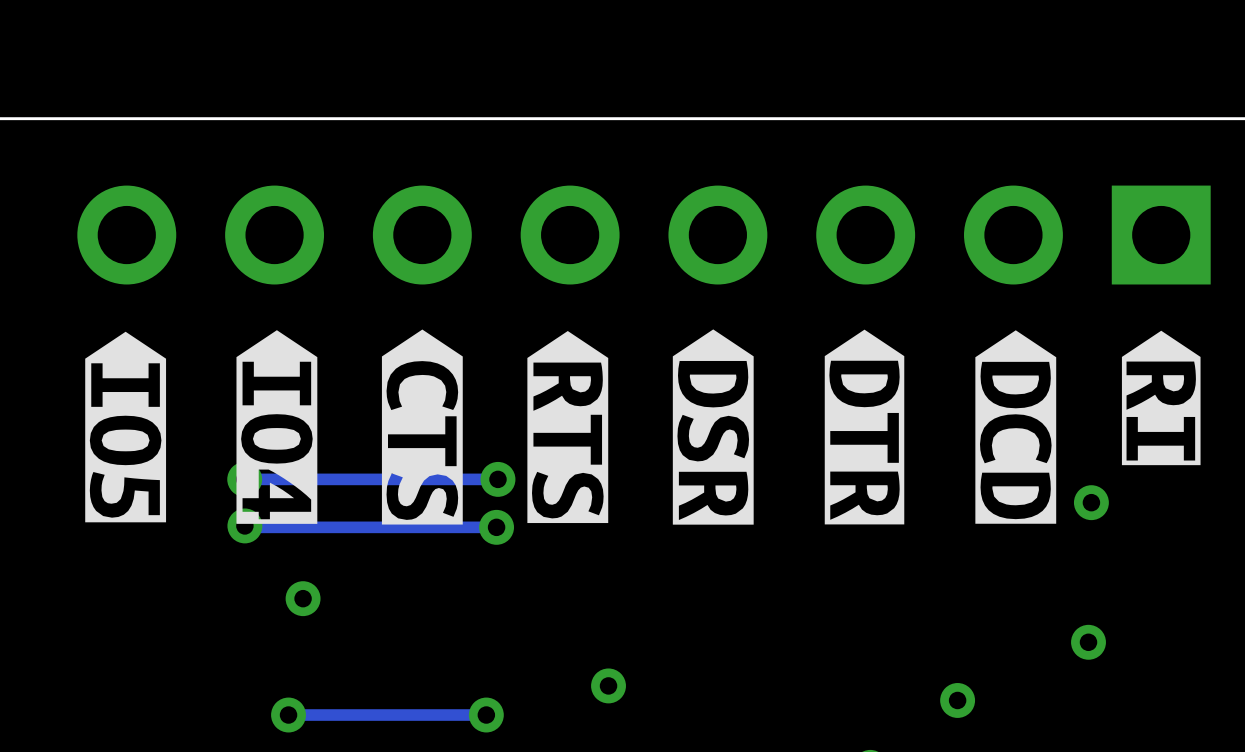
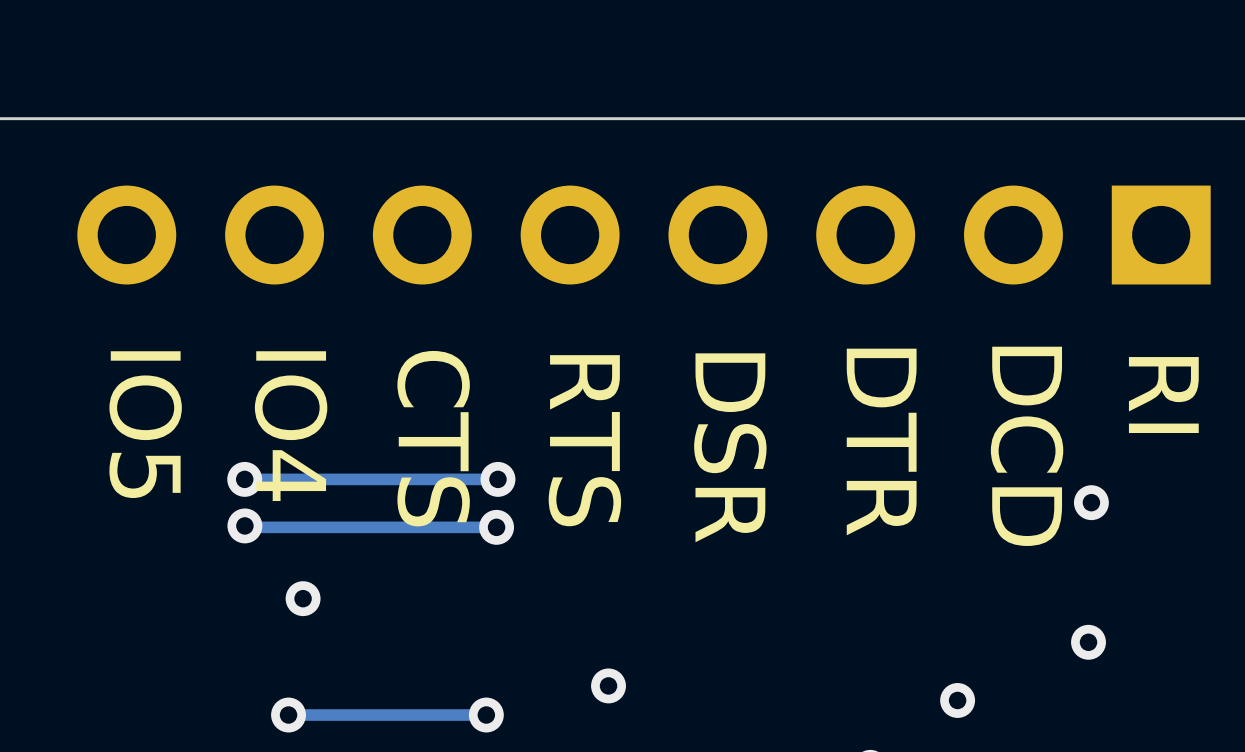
drawing: [236, 329, 754, 525] -> none
drawing: [824, 329, 905, 525] -> none
drawing: [975, 330, 1201, 524] -> none
drawing: [85, 331, 167, 523] -> none
text: none -> RI (1163, 395)
text: none -> IO5 (145, 424)
text: none -> IO4 (291, 426)
text: none -> CTS (433, 438)
text: none -> RTS (584, 440)
text: none -> DTR (881, 441)
text: none -> DSR (730, 447)
text: none -> DCD (1027, 446)

